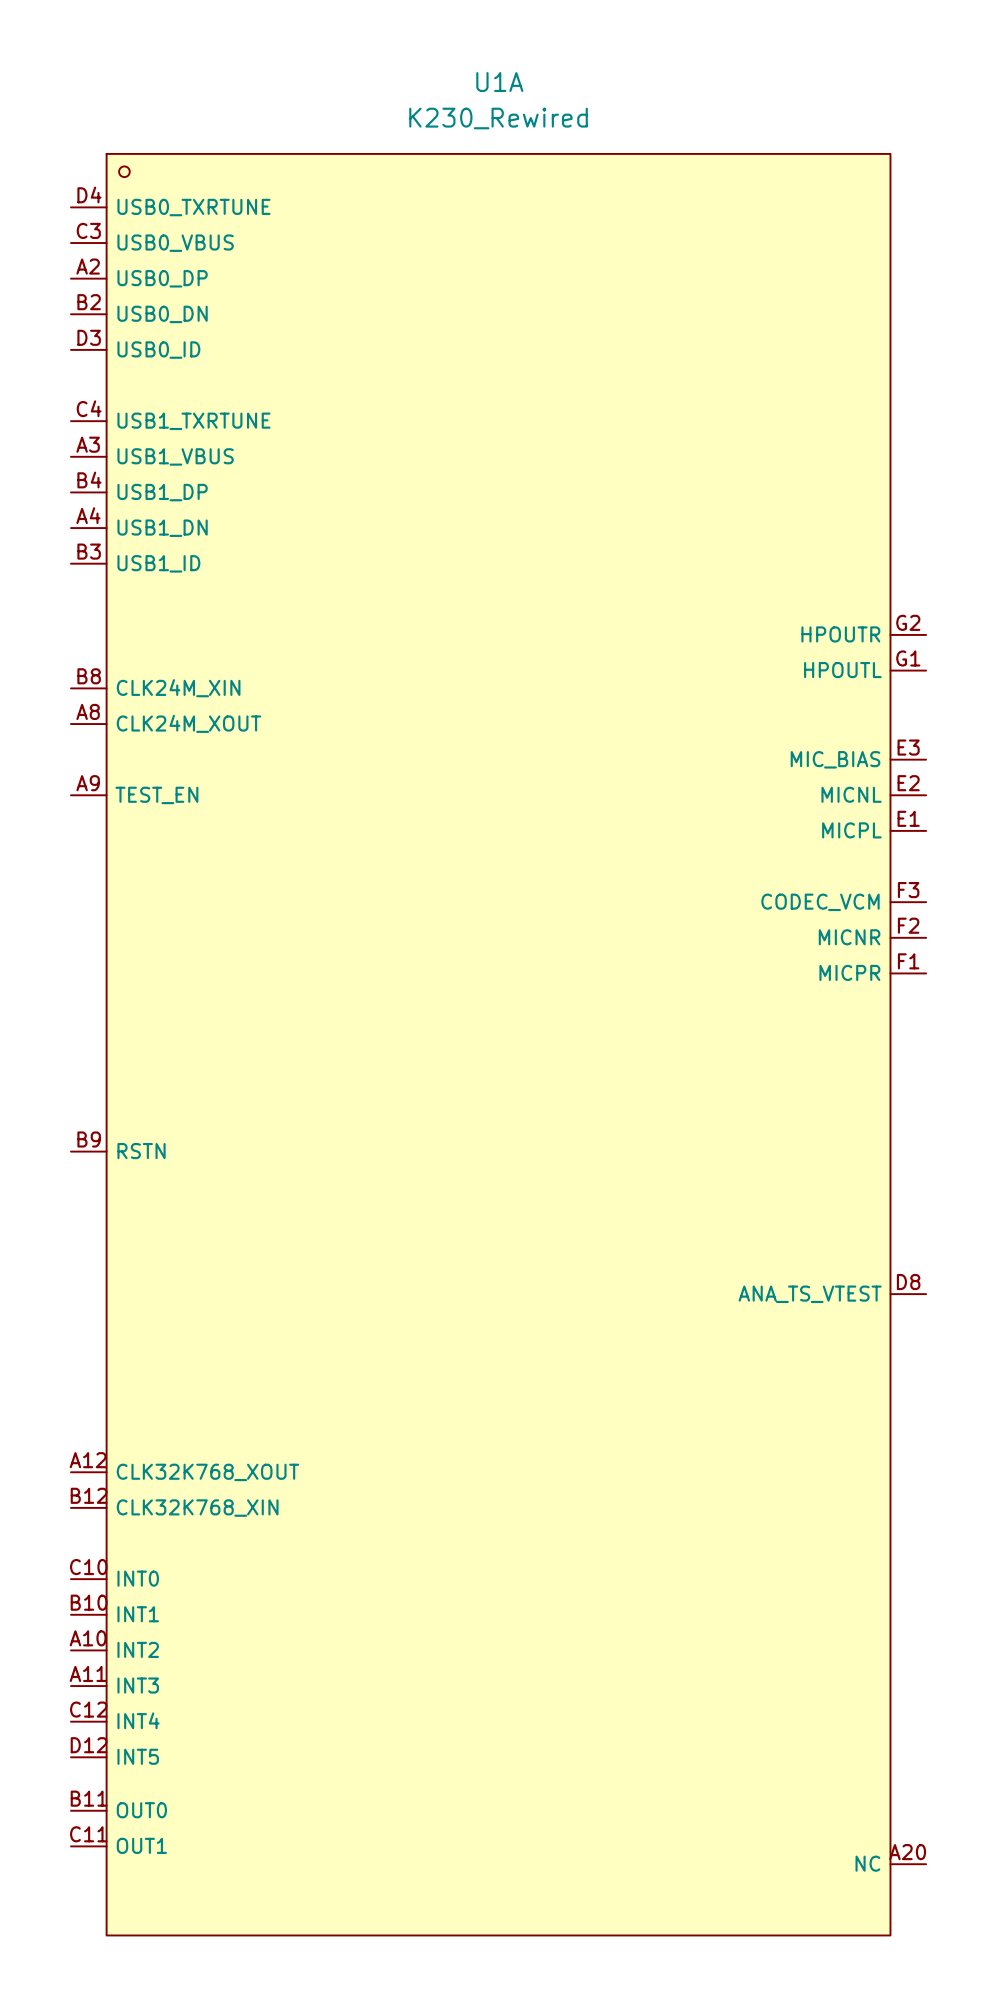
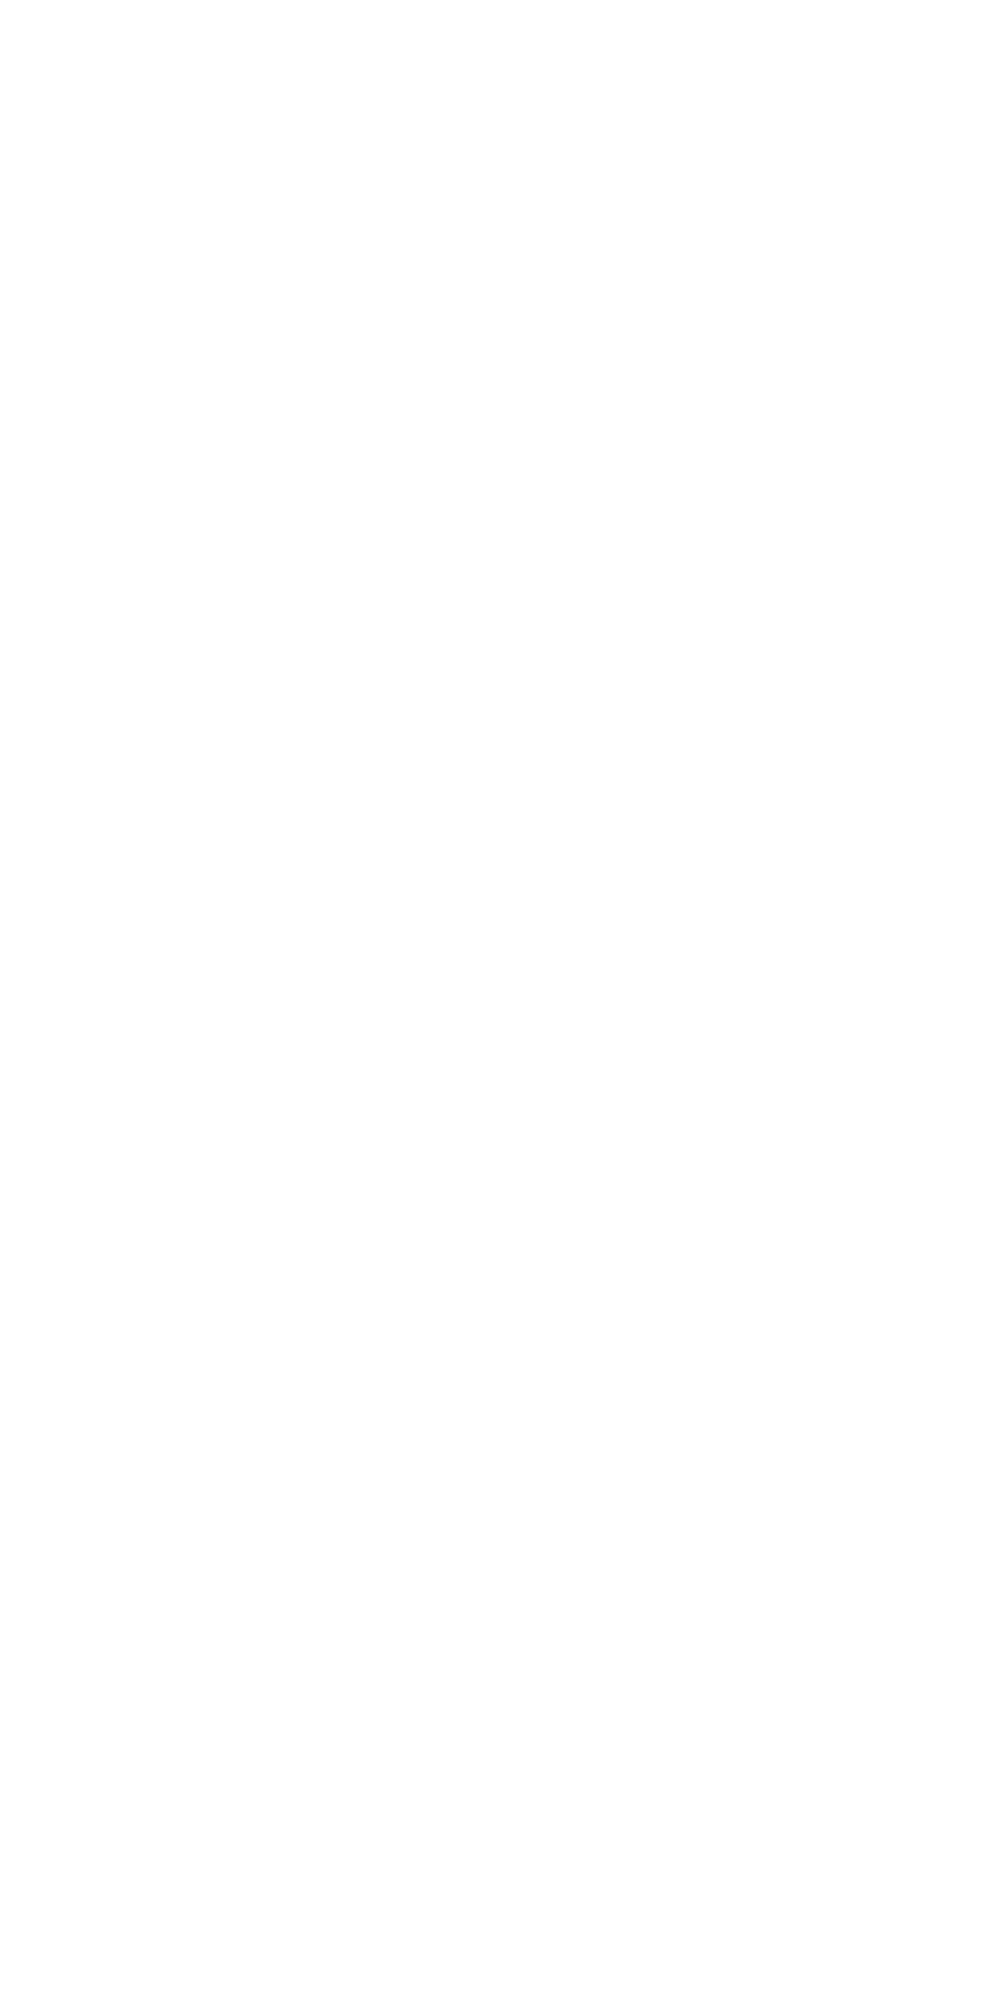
U1A: K230_Rewired (498, 1044) -> none

